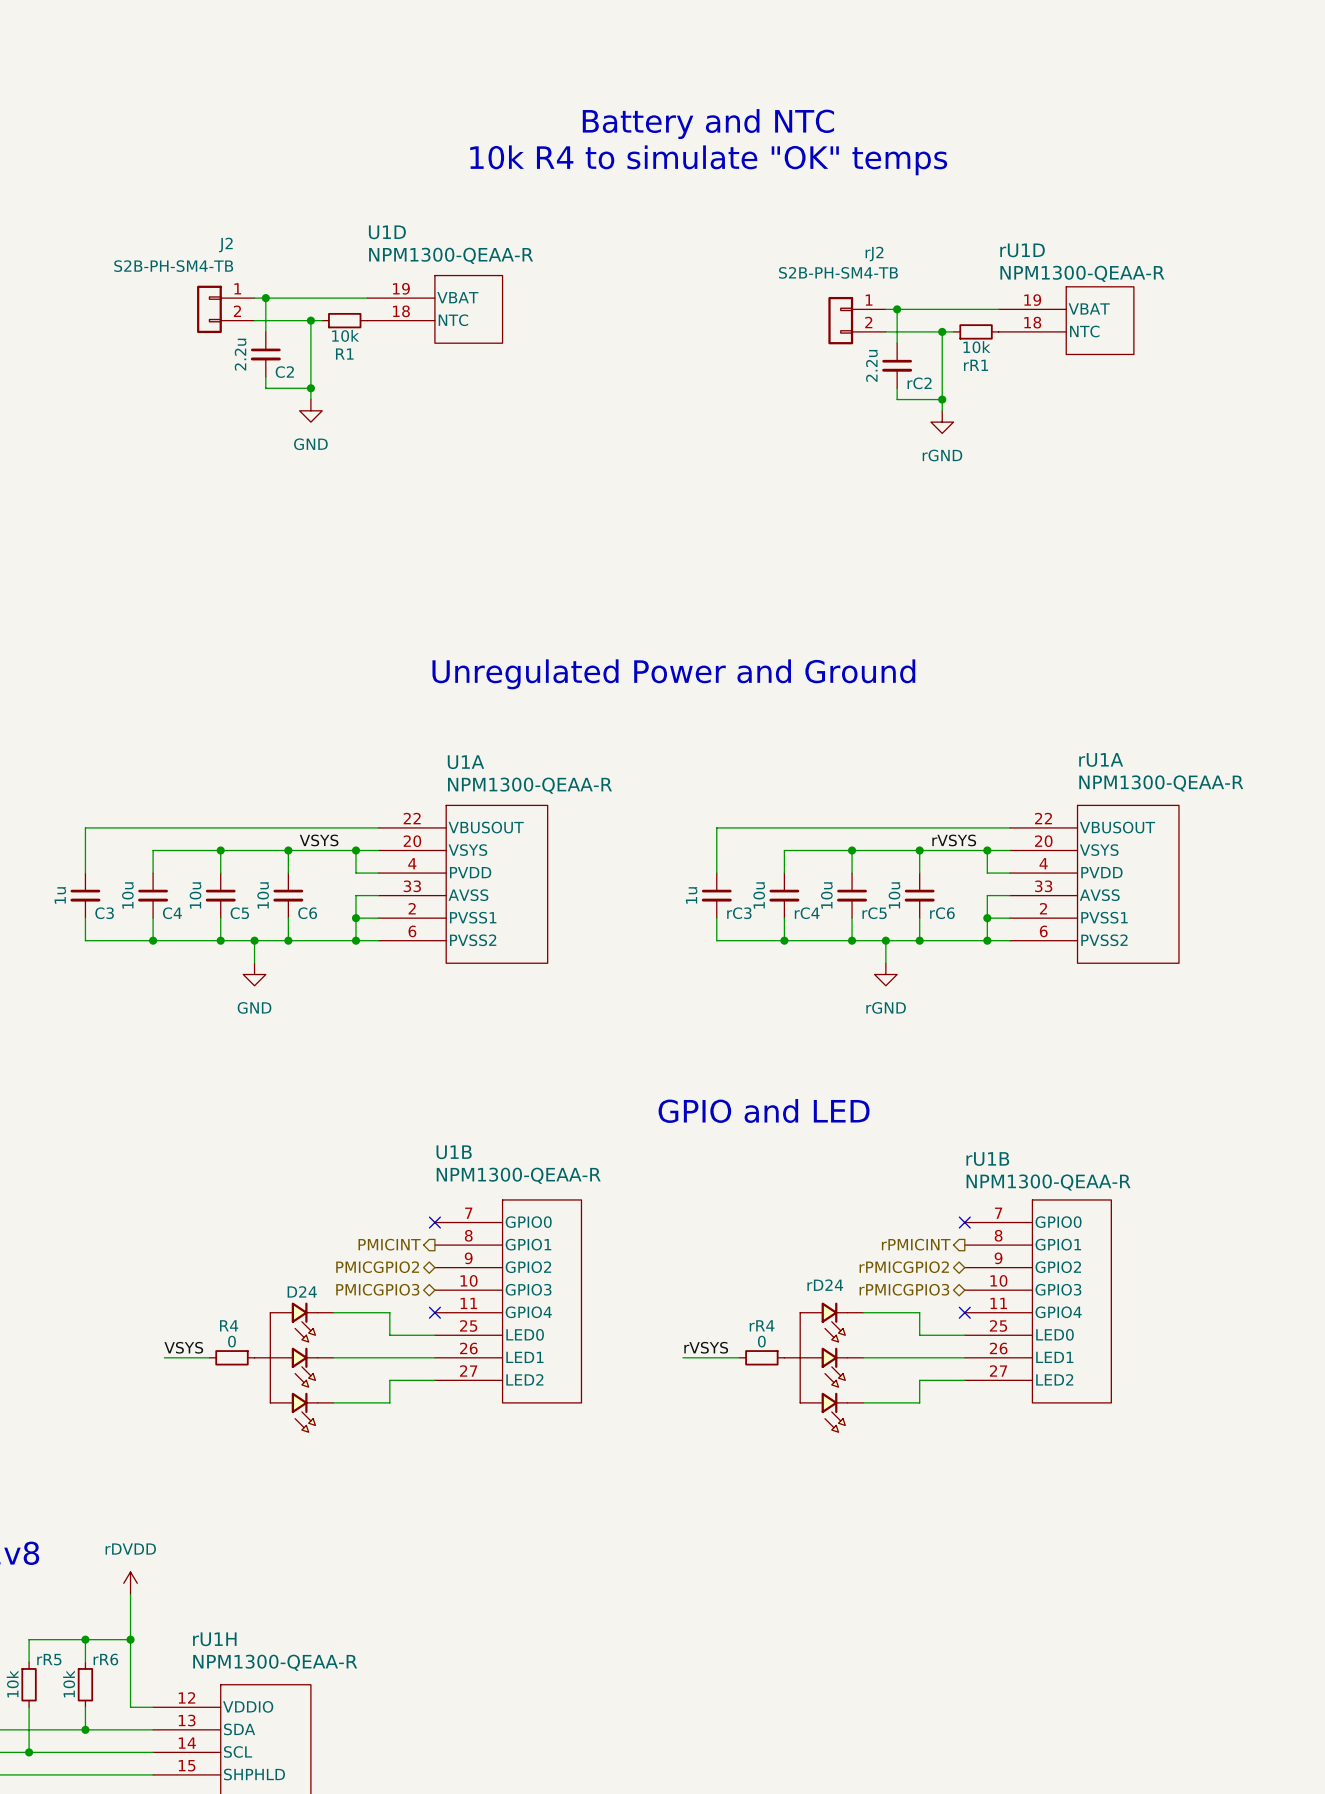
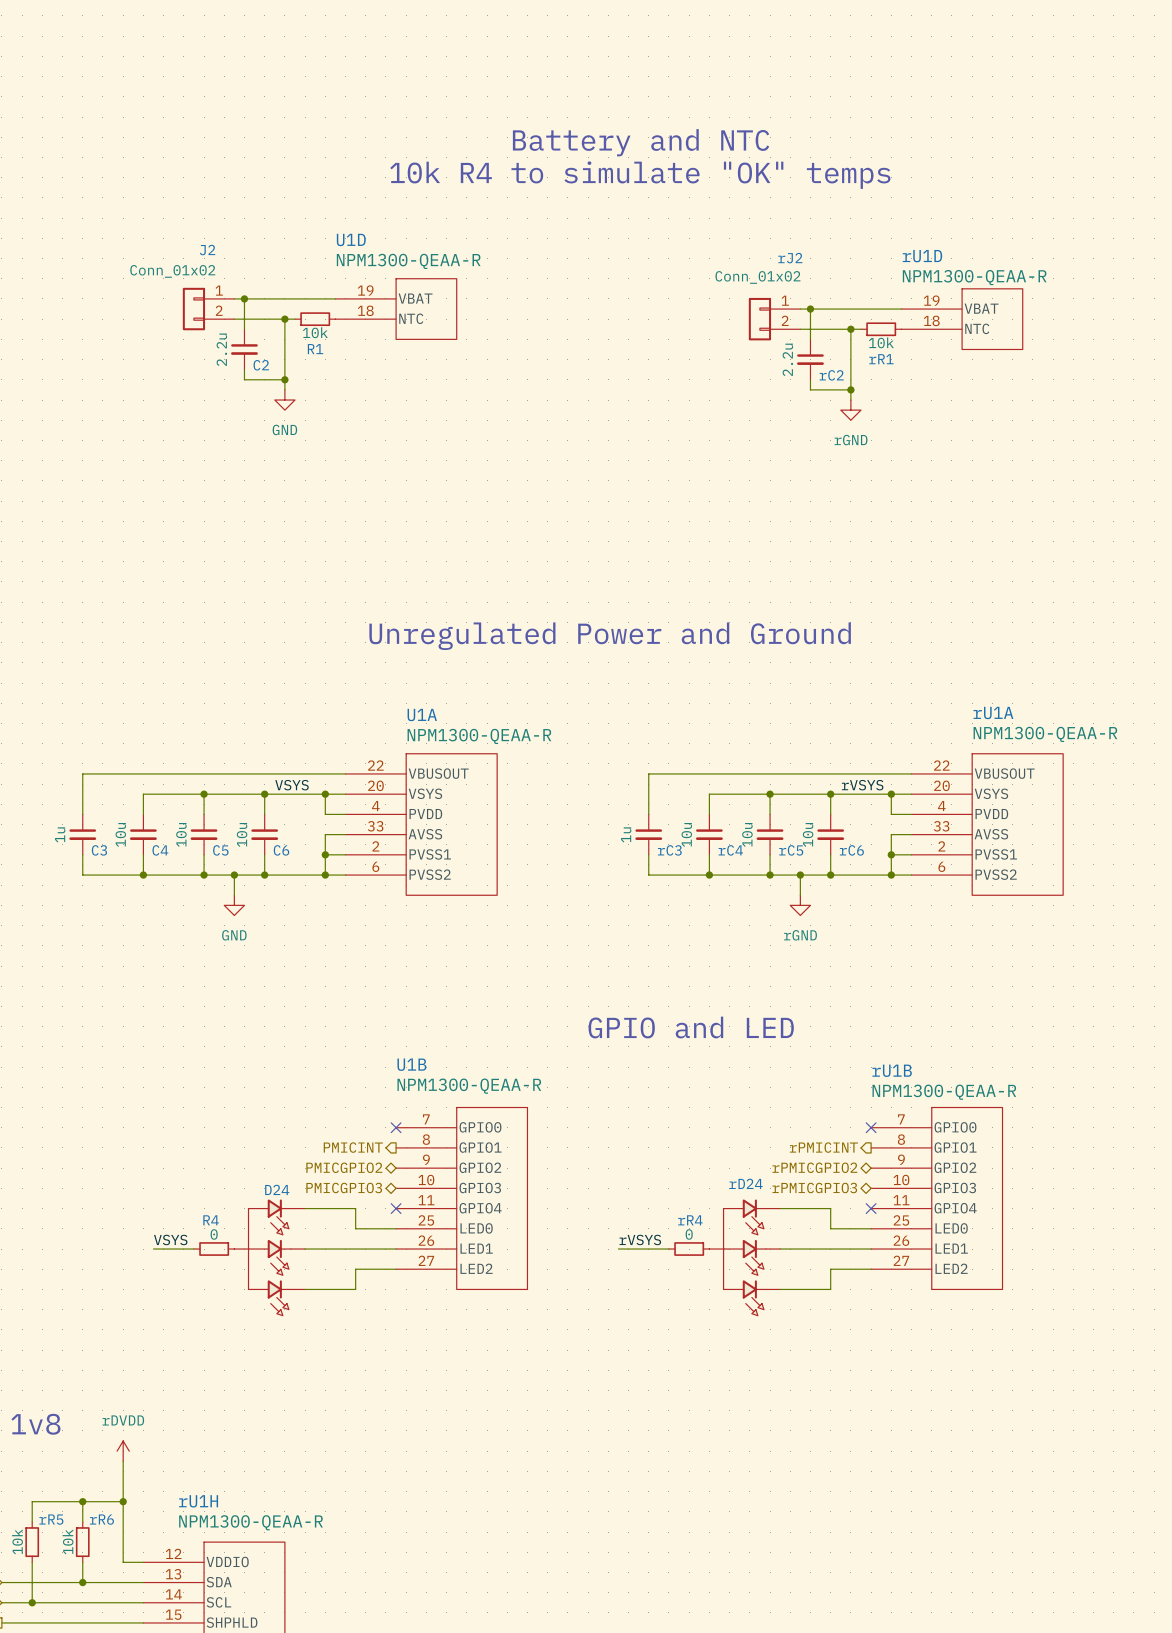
J2 value: S2B-PH-SM4-TB (173, 266) -> Conn_01x02 (172, 271)
rJ2 value: S2B-PH-SM4-TB (838, 272) -> Conn_01x02 (757, 277)

